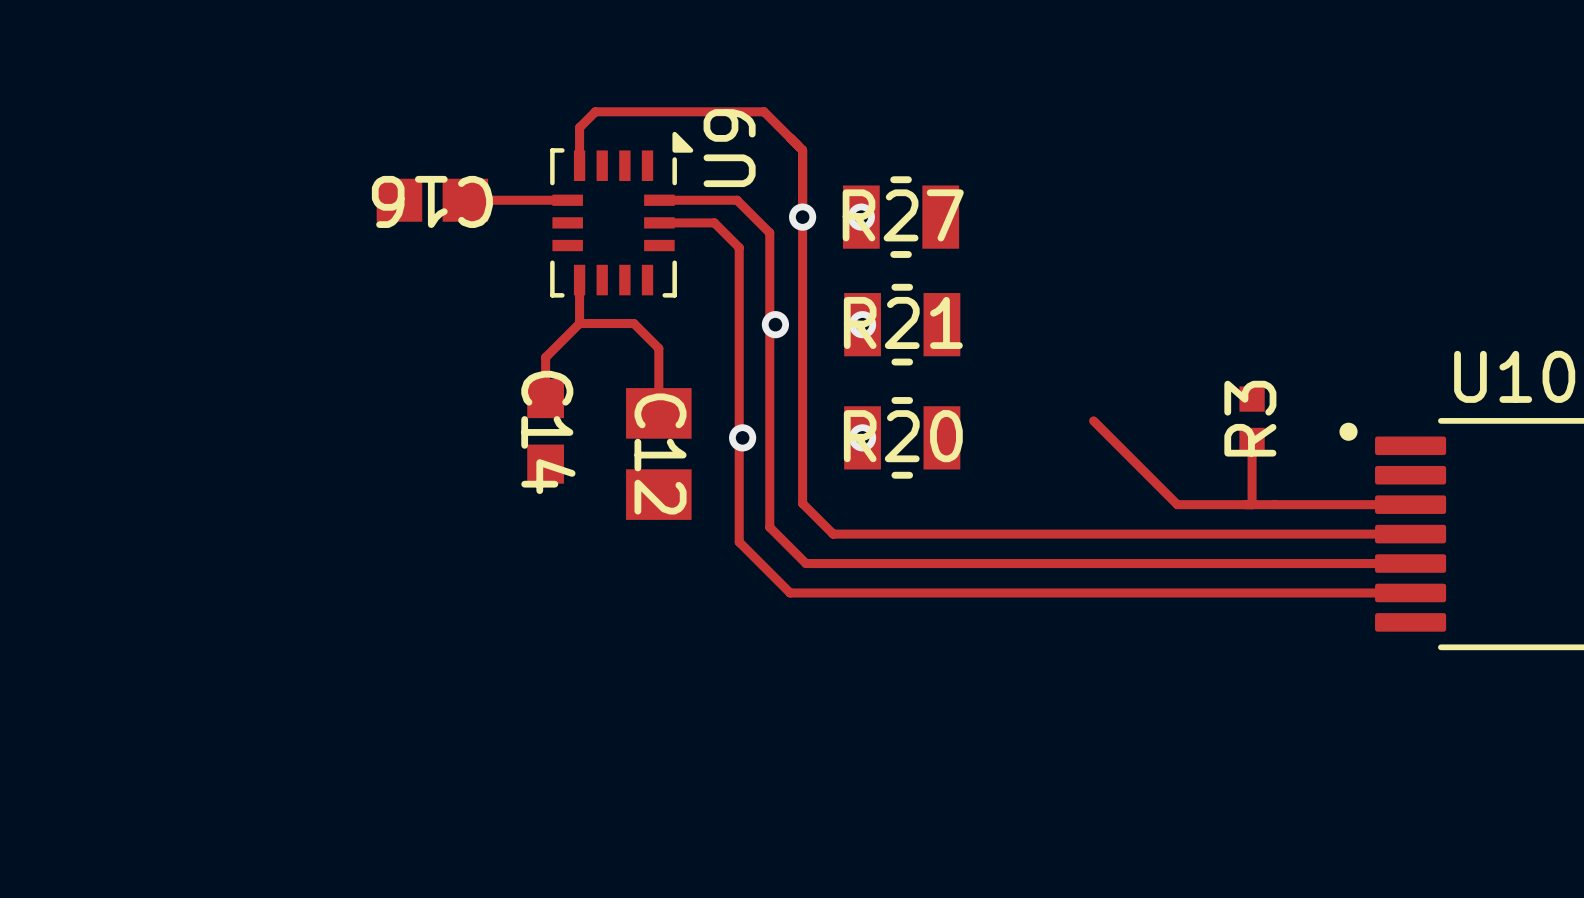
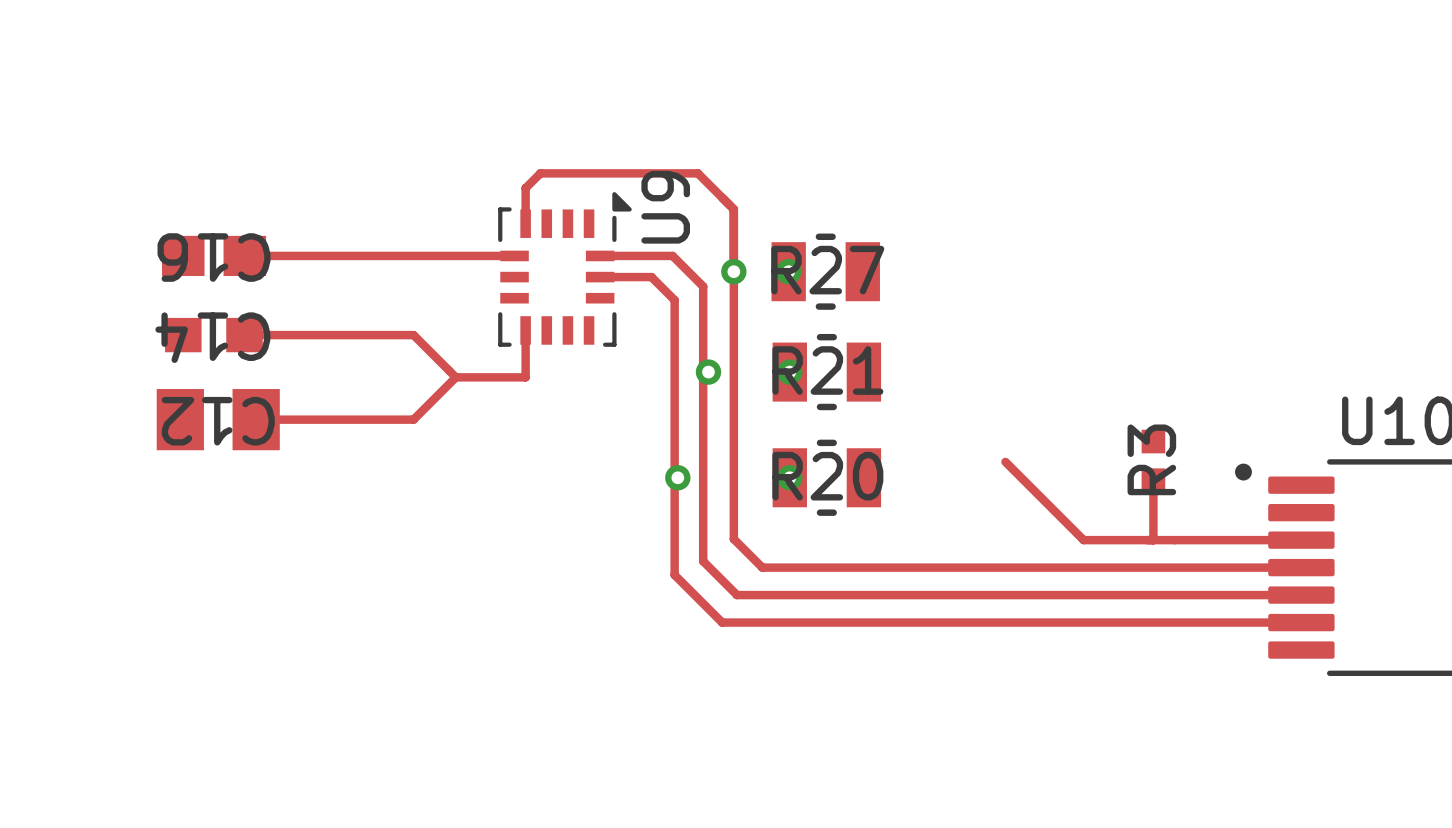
track: none -> (244, 255) (419, 255)
C16 position: (432, 200) -> (214, 255)
track: none -> (244, 335) (413, 335) (455, 377)
track: none -> (525, 371) (525, 377) (455, 377)
track: none -> (455, 377) (413, 419) (256, 419)
track: (545, 398) (545, 357) (579, 323) (633, 323) (658, 348) (658, 413) -> none
C14 rotation: 0° (545, 431) -> 90° clockwise (213, 335)
C14 position: (545, 431) -> (213, 335)
C12 rotation: 0° (658, 453) -> 90° clockwise (218, 419)
C12 position: (658, 453) -> (218, 419)

